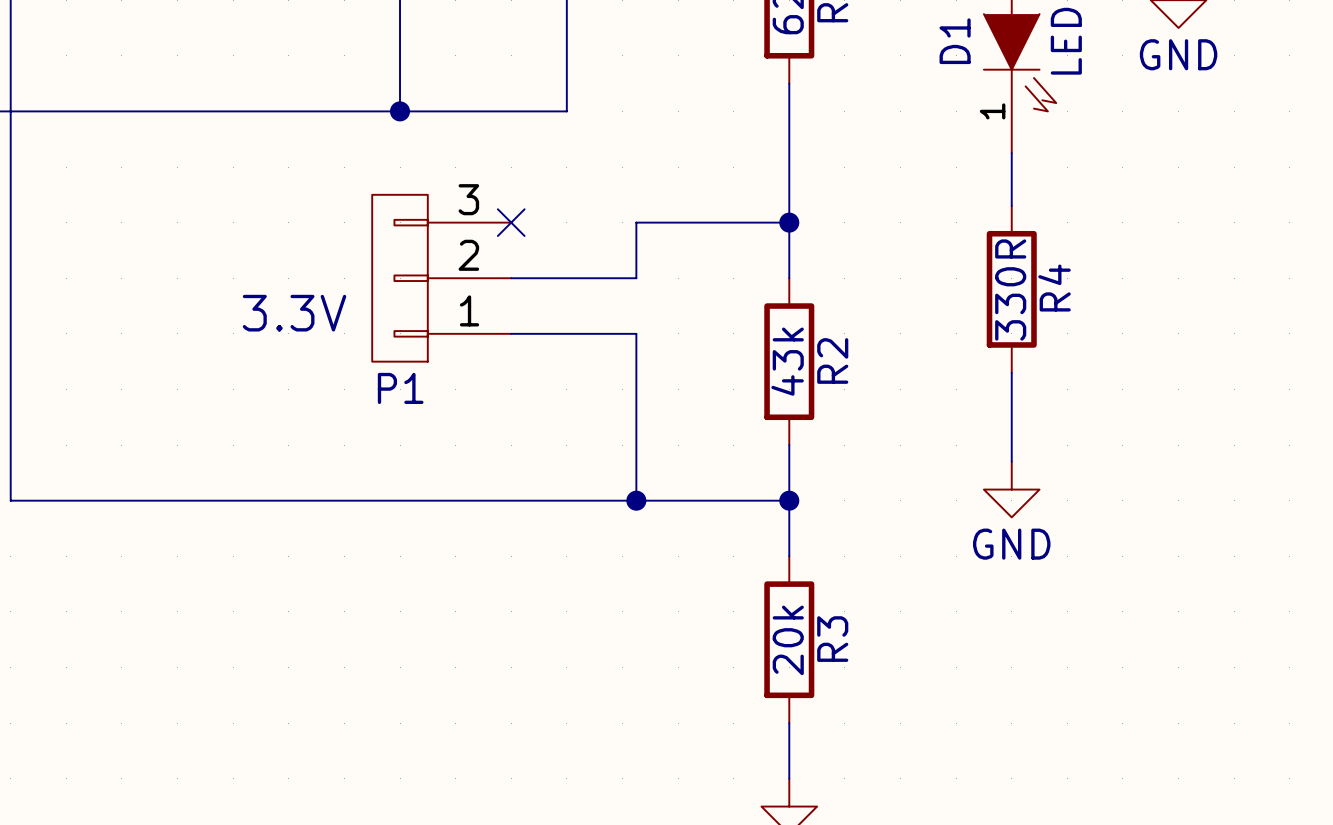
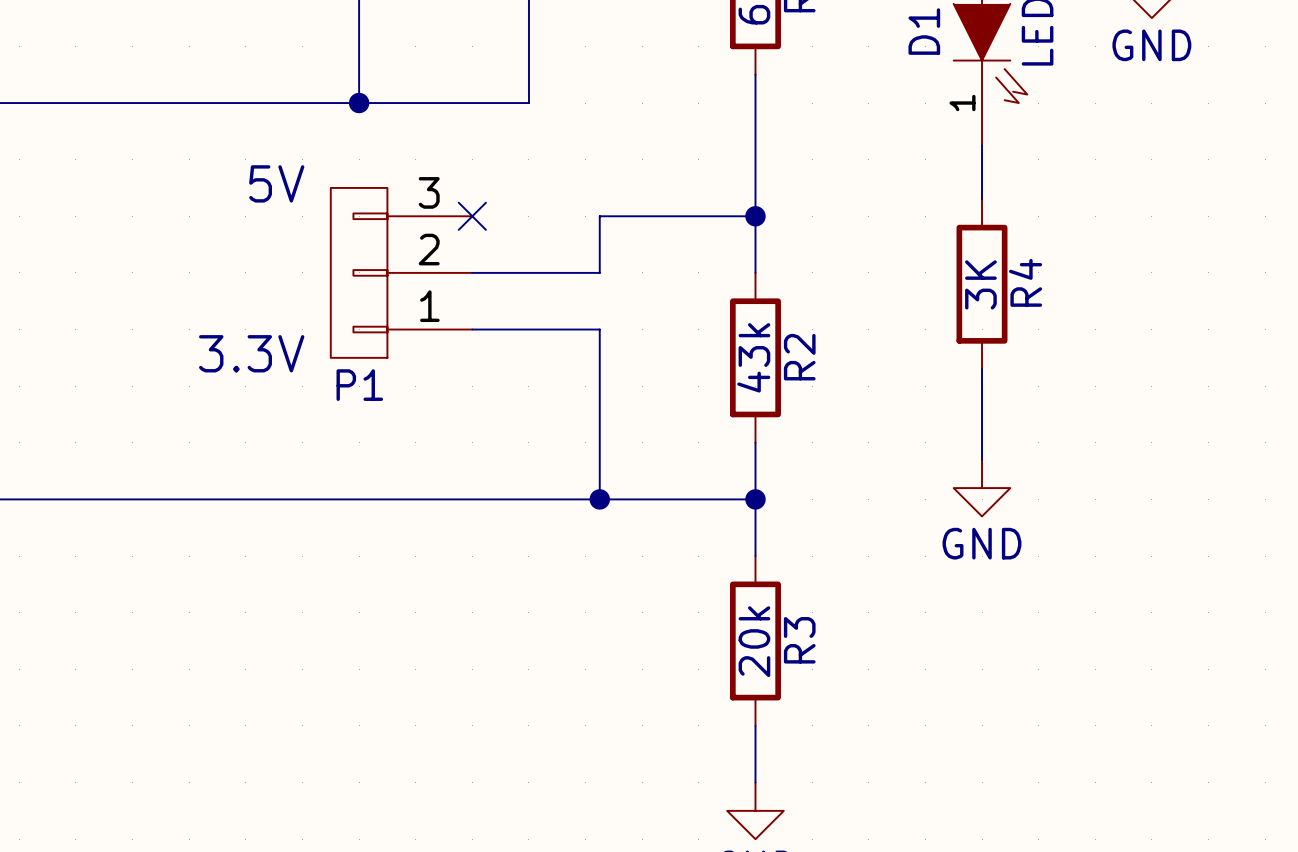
text: none -> 5V (276, 183)
R4 value: 330R (1010, 290) -> 3K (980, 284)
text position: 3.3V (294, 313) -> 3.3V (251, 353)

